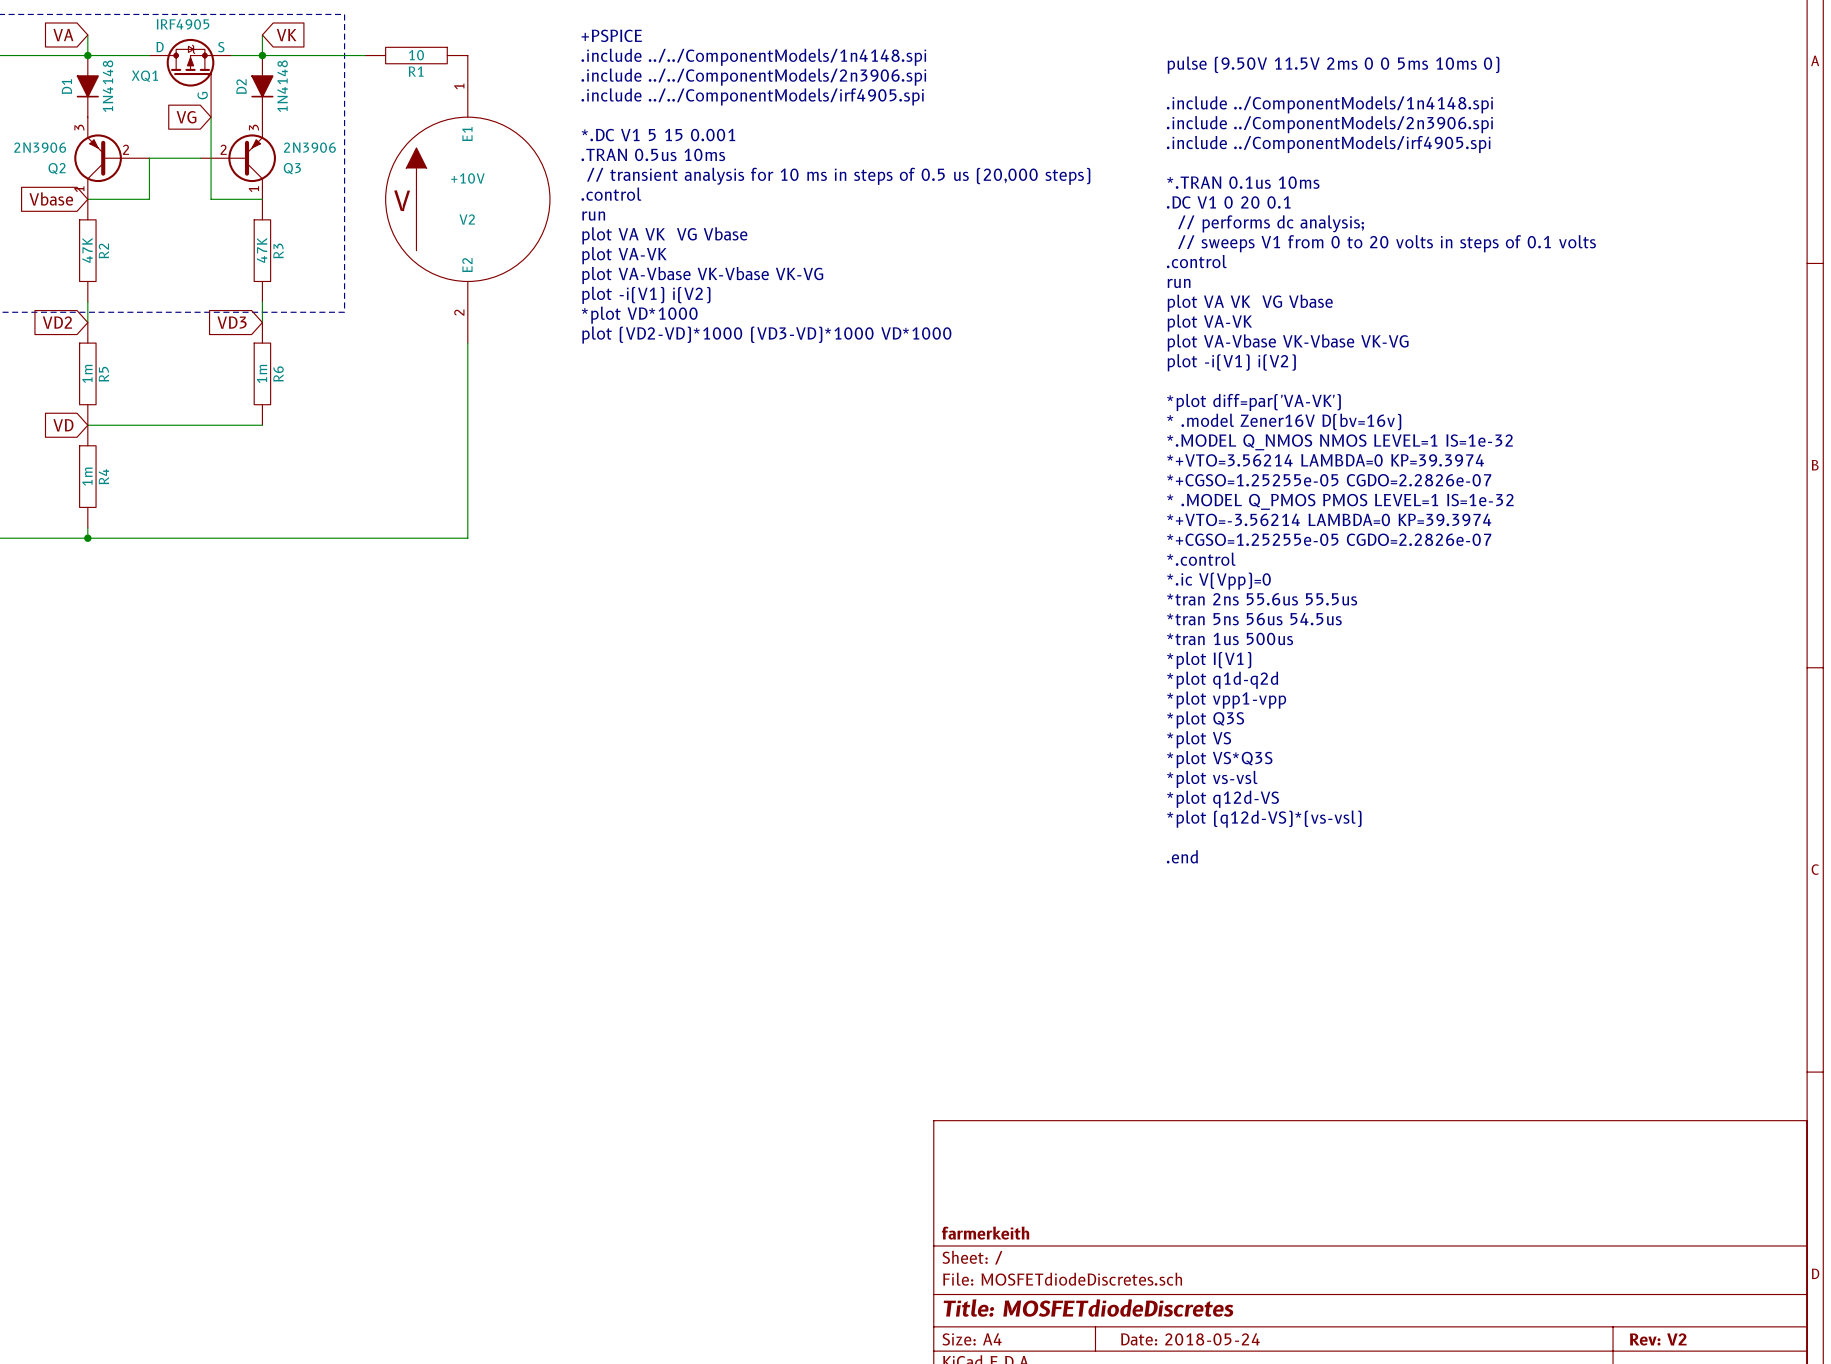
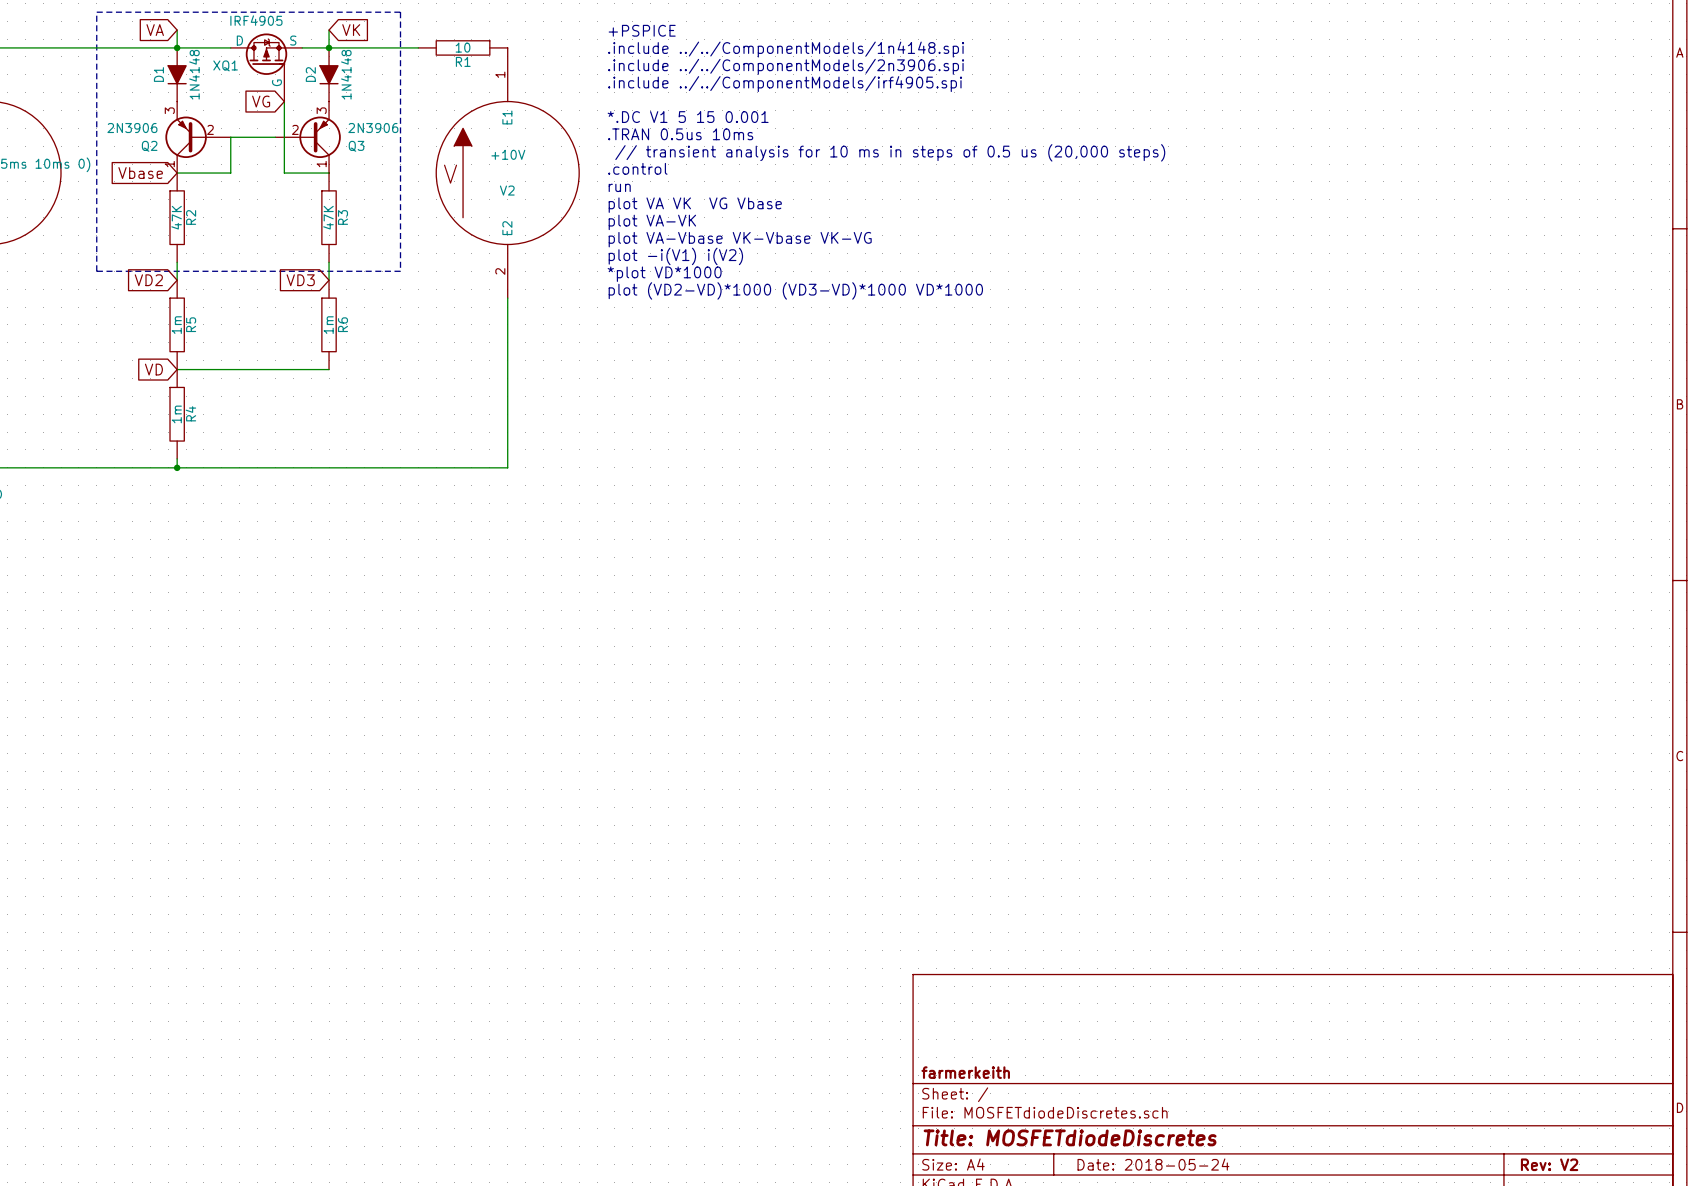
text: pulse (9.50V 11.5V 2ms 0 0 5ms 10ms 0) (1333, 65) -> none
text: .include ../ComponentModels/1n4148.spi (1329, 104) -> none
text: .include ../ComponentModels/2n3906.spi (1329, 124) -> none
text: .include ../ComponentModels/irf4905.spi (1328, 144) -> none
text: *.TRAN 0.1us 10ms (1243, 182) -> none
text: .DC V1 0 20 0.1 (1228, 202) -> none
text: // performs dc analysis; (1271, 223) -> none
text: // sweeps V1 from 0 to 20 volts in steps of 0.1 volts (1387, 243) -> none
text: .control (1196, 261) -> none
text: run (1179, 283) -> none
text: plot VA VK VG Vbase (1250, 303) -> none
text: plot VA-VK (1209, 323) -> none
text: plot VA-Vbase VK-Vbase VK-VG (1288, 342) -> none
text: plot -i(V1) i(V2) (1231, 362) -> none
text: *plot diff=par('VA-VK') (1254, 402) -> none
text: * .model Zener16V D(bv=16v) (1284, 421) -> none
text: *.MODEL Q_NMOS NMOS LEVEL=1 IS=1e-32 (1339, 442) -> none
text: *+VTO=3.56214 LAMBDA=0 KP=39.3974 (1325, 460) -> none
text: *+CGSO=1.25255e-05 CGDO=2.2826e-07 (1329, 480) -> none
text: * .MODEL Q_PMOS PMOS LEVEL=1 IS=1e-32 (1340, 501) -> none
text: *+VTO=-3.56214 LAMBDA=0 KP=39.3974 (1329, 519) -> none
text: *+CGSO=1.25255e-05 CGDO=2.2826e-07 (1329, 539) -> none
text: *.control (1201, 559) -> none
text: *.ic V(Vpp)=0 (1219, 581) -> none
text: *tran 2ns 55.6us 55.5us (1262, 599) -> none
text: *tran 5ns 56us 54.5us (1254, 619) -> none
text: *tran 1us 500us (1230, 638) -> none
text: *plot I(V1) (1209, 660) -> none
text: *plot q1d-q2d (1222, 680) -> none
text: *plot vpp1-vpp (1226, 700) -> none
text: *plot Q3S (1205, 719) -> none
text: *plot VS (1199, 739) -> none
text: *plot VS*Q3S (1219, 759) -> none
text: *plot vs-vsl (1212, 779) -> none
text: *plot q12d-VS (1223, 799) -> none
text: *plot (q12d-VS)*(vs-vsl) (1264, 819) -> none
text: .end (1182, 856) -> none

